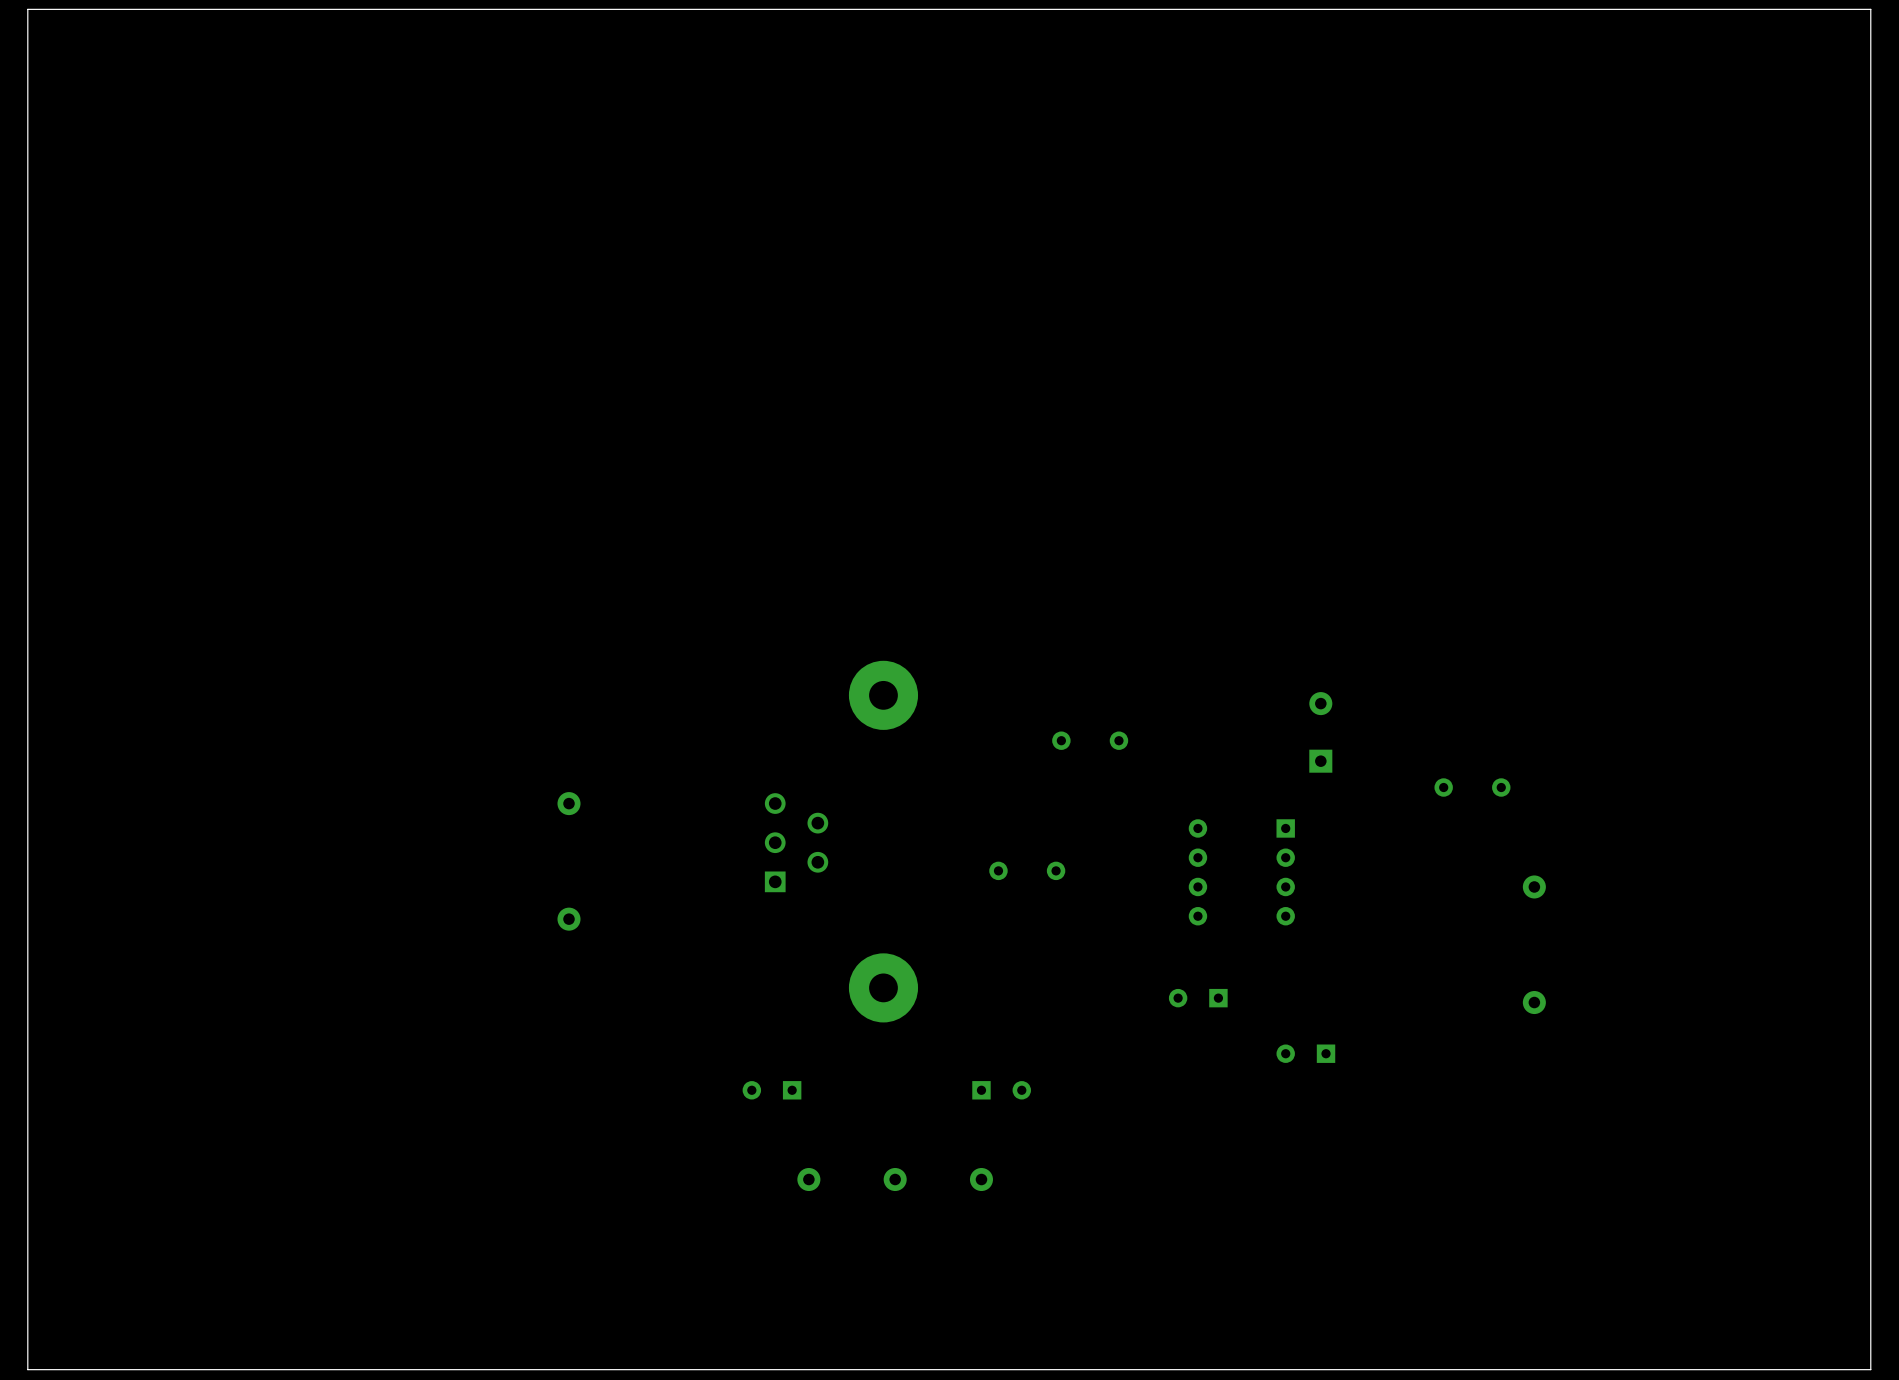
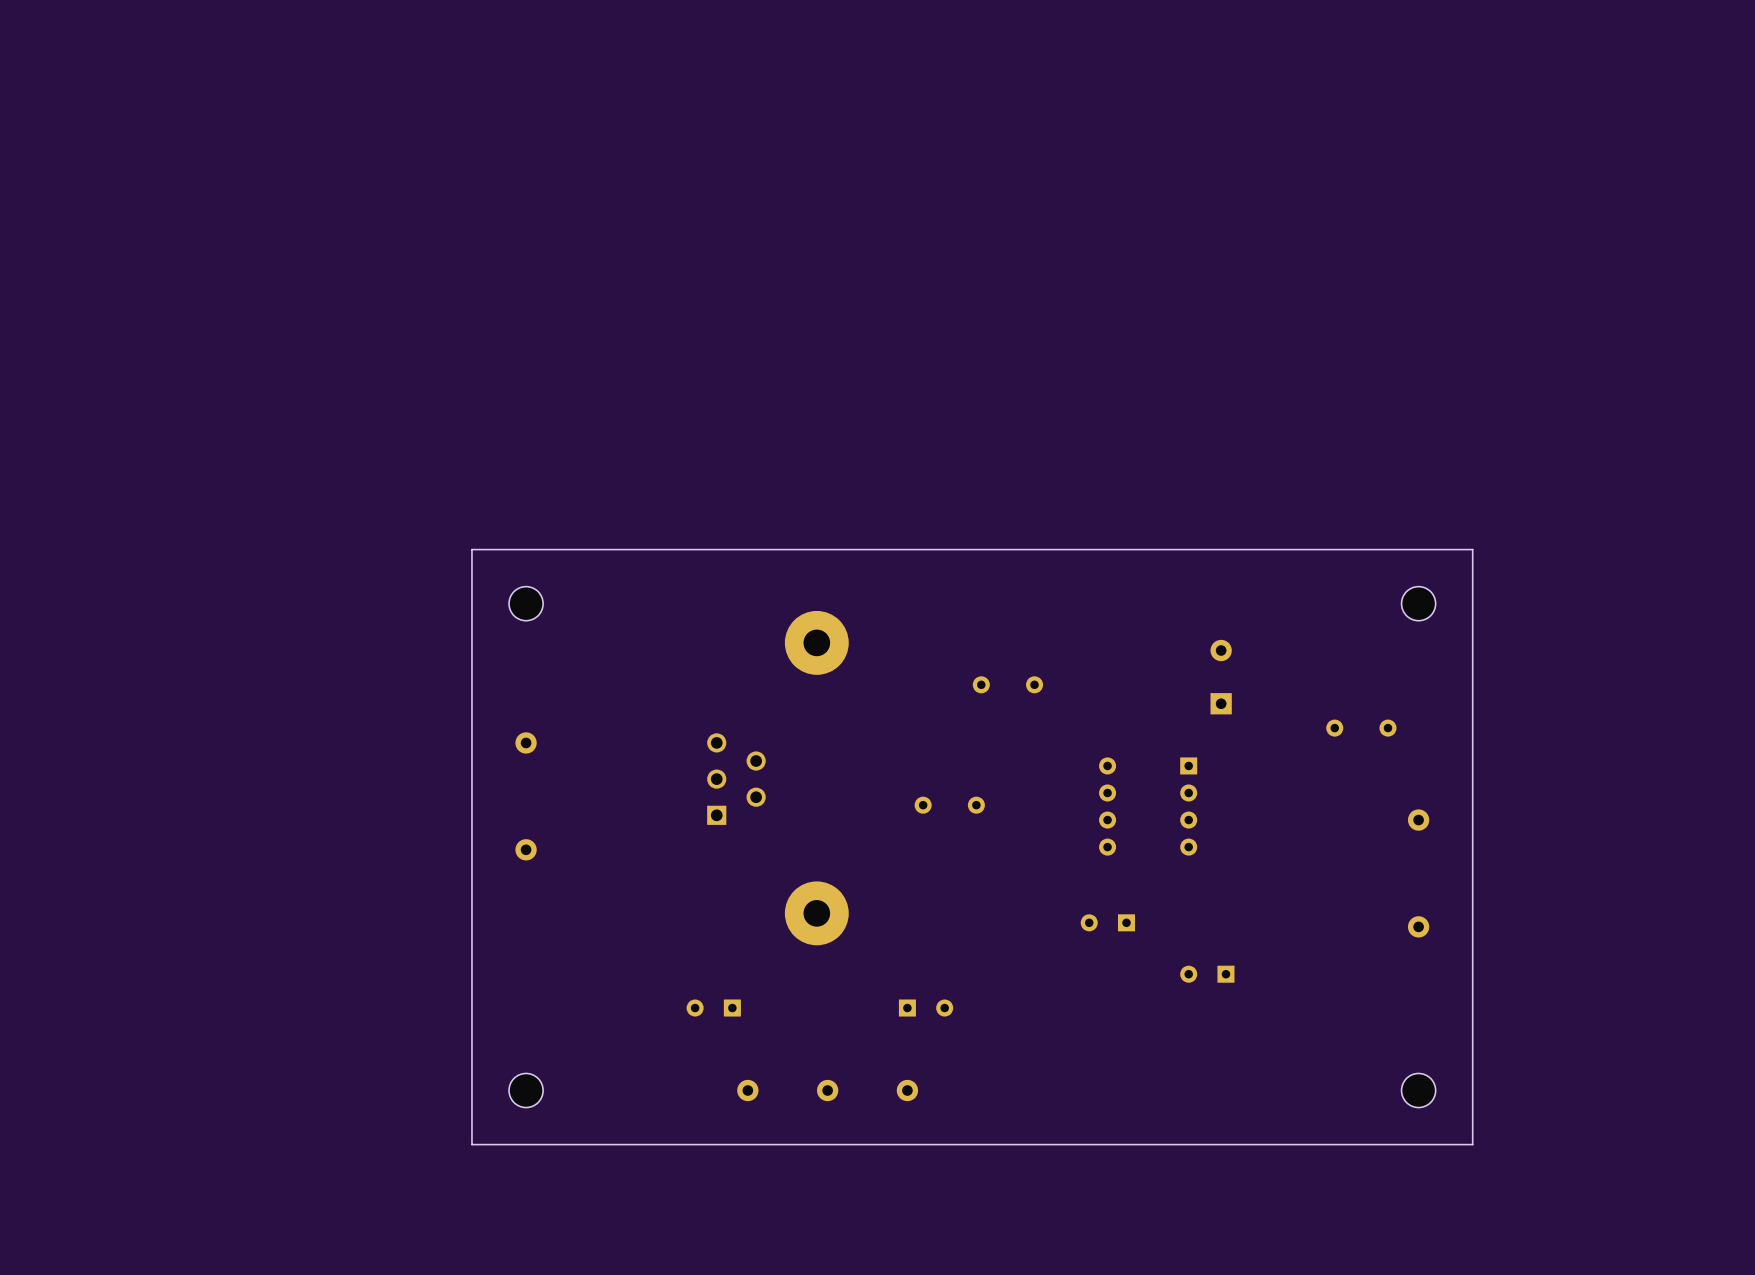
board edge: (1870, 9) (1870, 1369) (27, 1369) (27, 9) (1870, 9) -> none
board edge: none -> (1472, 549) (1472, 1144) (471, 1144) (471, 549) (1472, 549)
part: none -> (526, 603)
part: none -> (1418, 603)
part: none -> (526, 1090)
part: none -> (1418, 1090)

